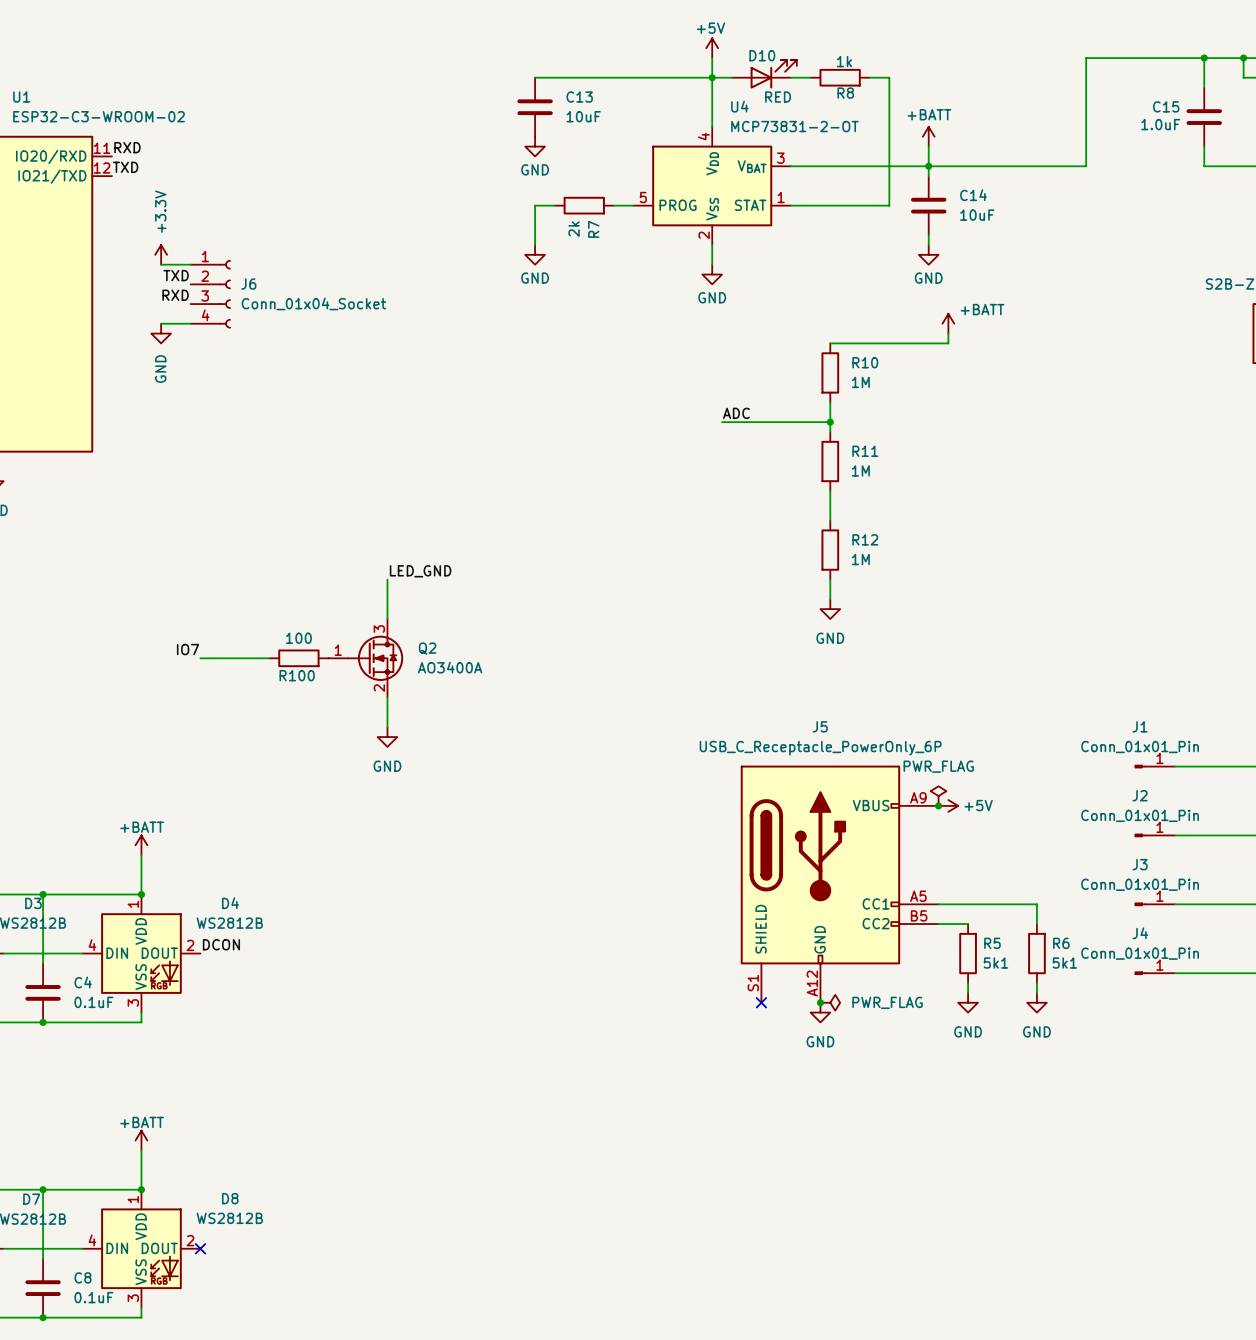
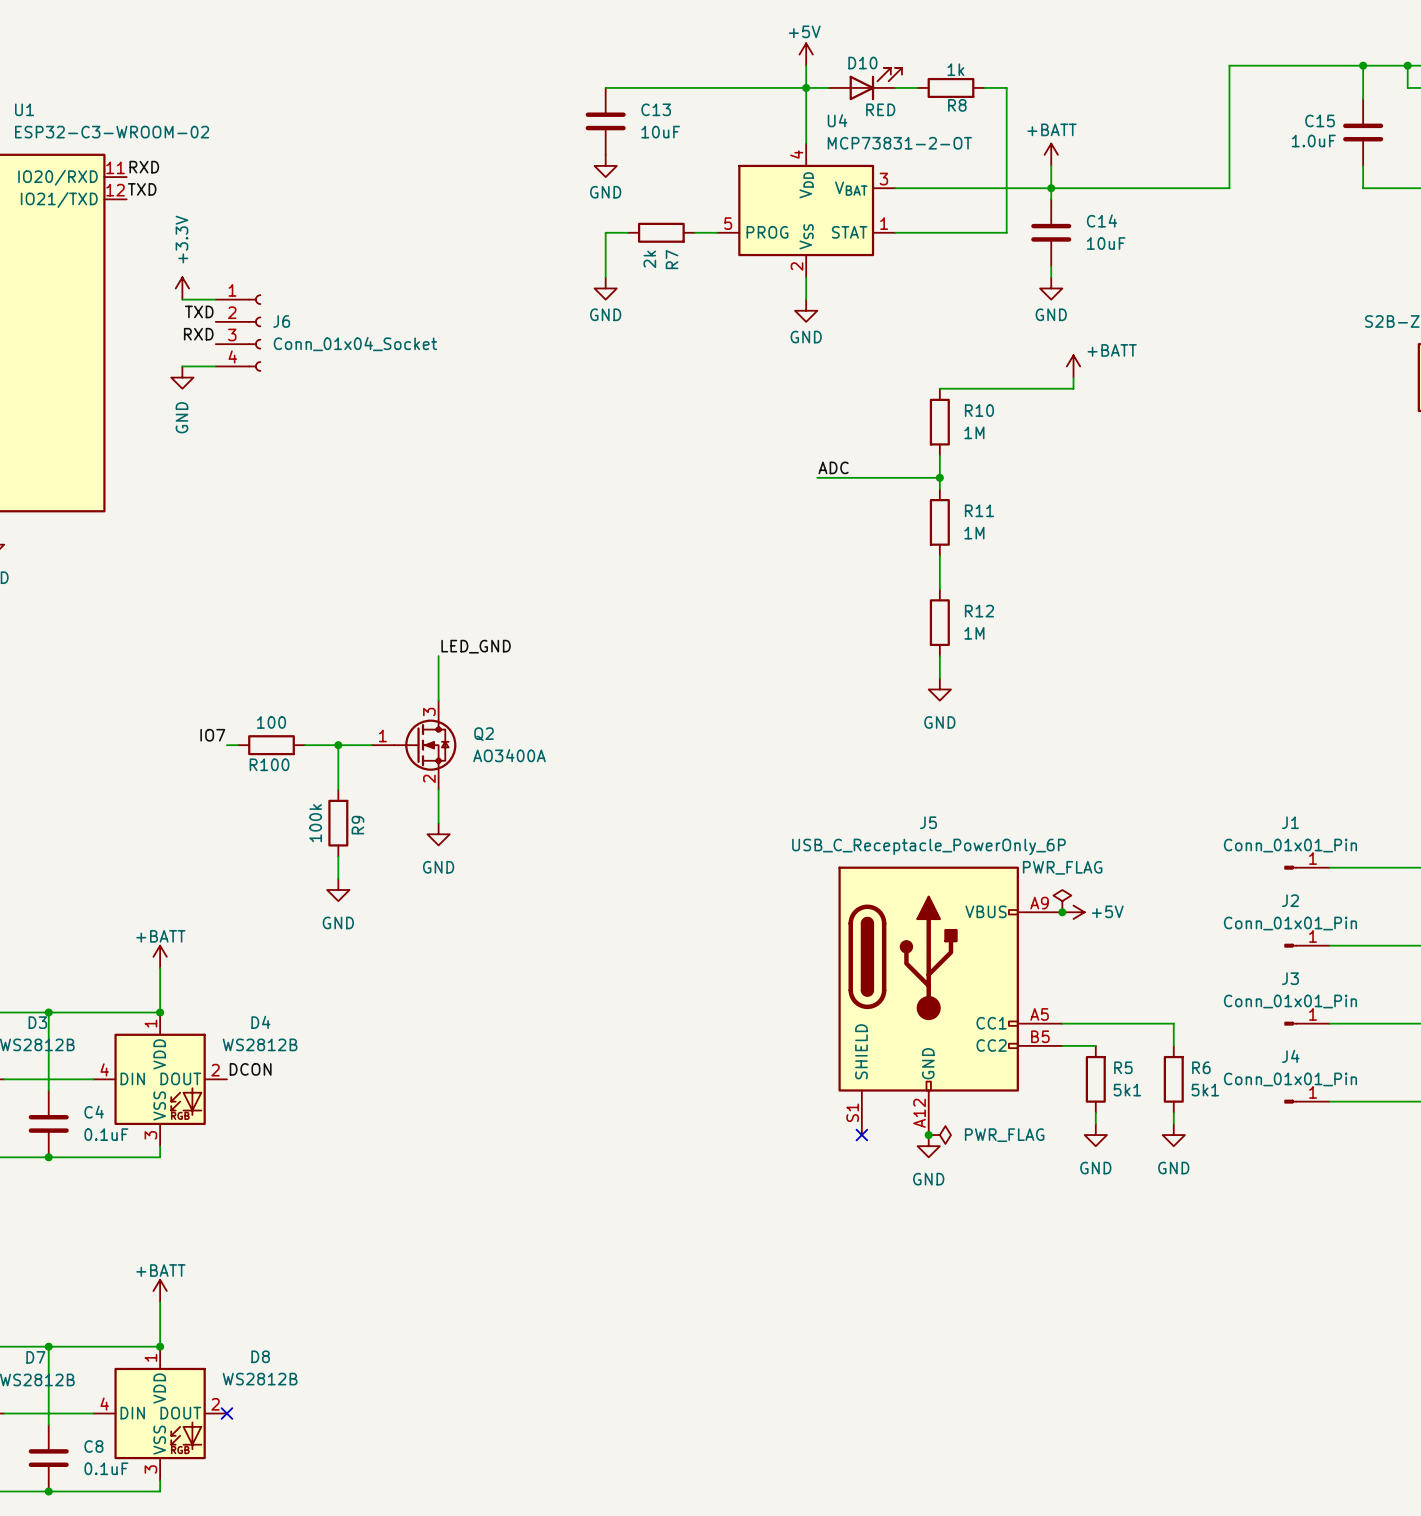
wire: (210, 658) (269, 658) -> (371, 745) (304, 745)
wire: none -> (338, 745) (338, 789)
R100 position: (298, 658) -> (271, 745)
junction: none -> (338, 745)
R9: none -> 100k (338, 823)
wire: none -> (338, 856) (338, 878)
power symbol: none -> GND (338, 889)

